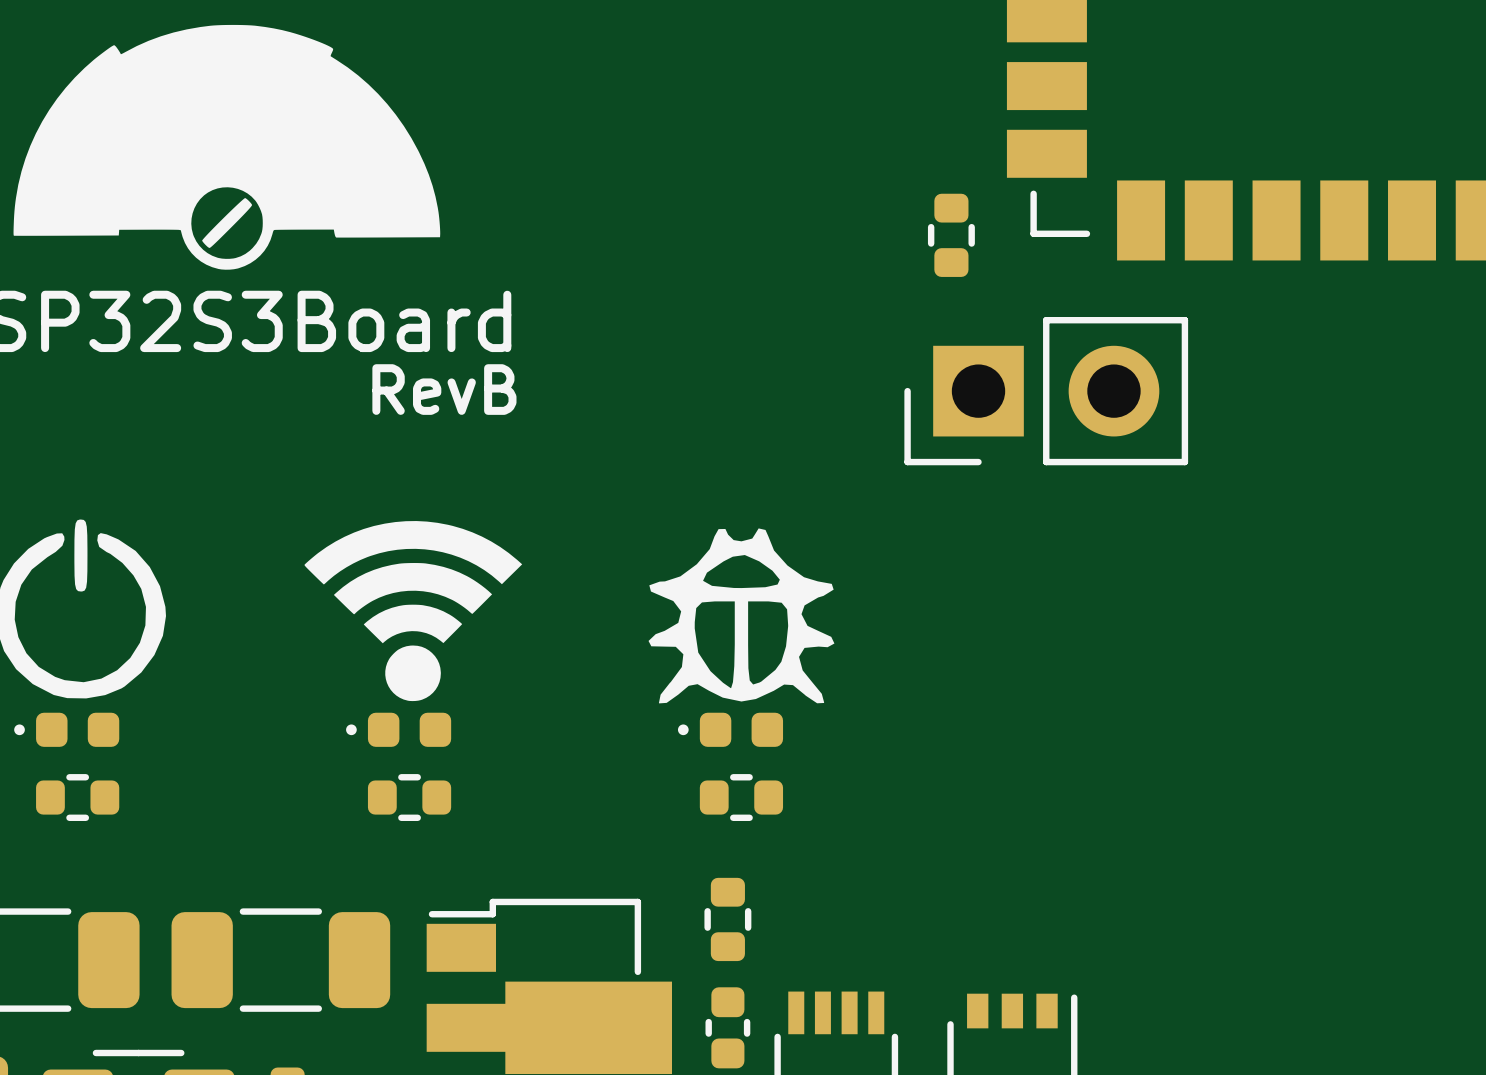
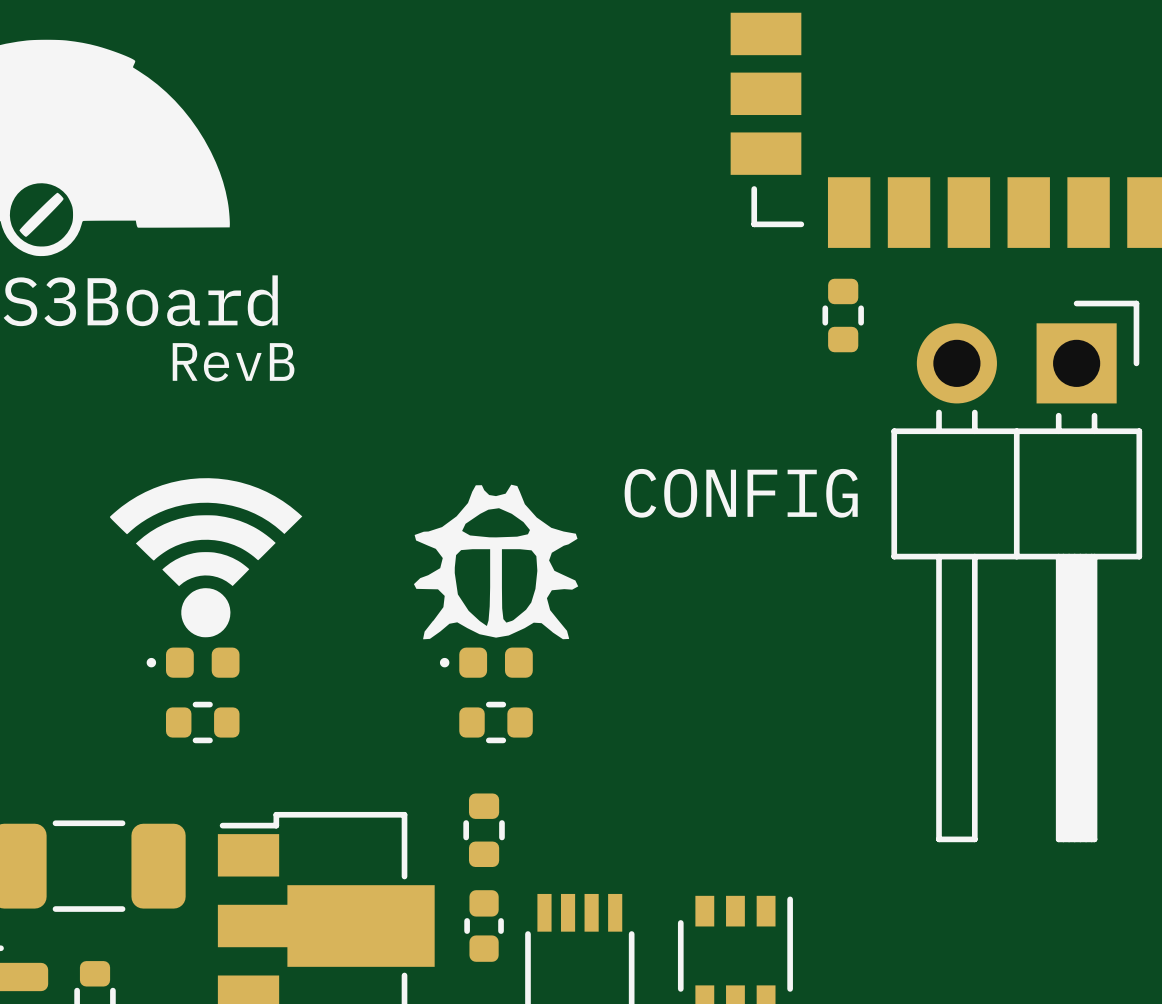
part position: (951, 235) -> (843, 315)
part: (1046, 391) -> none
text: none -> CONFIG (741, 493)
part: none -> (1016, 571)

